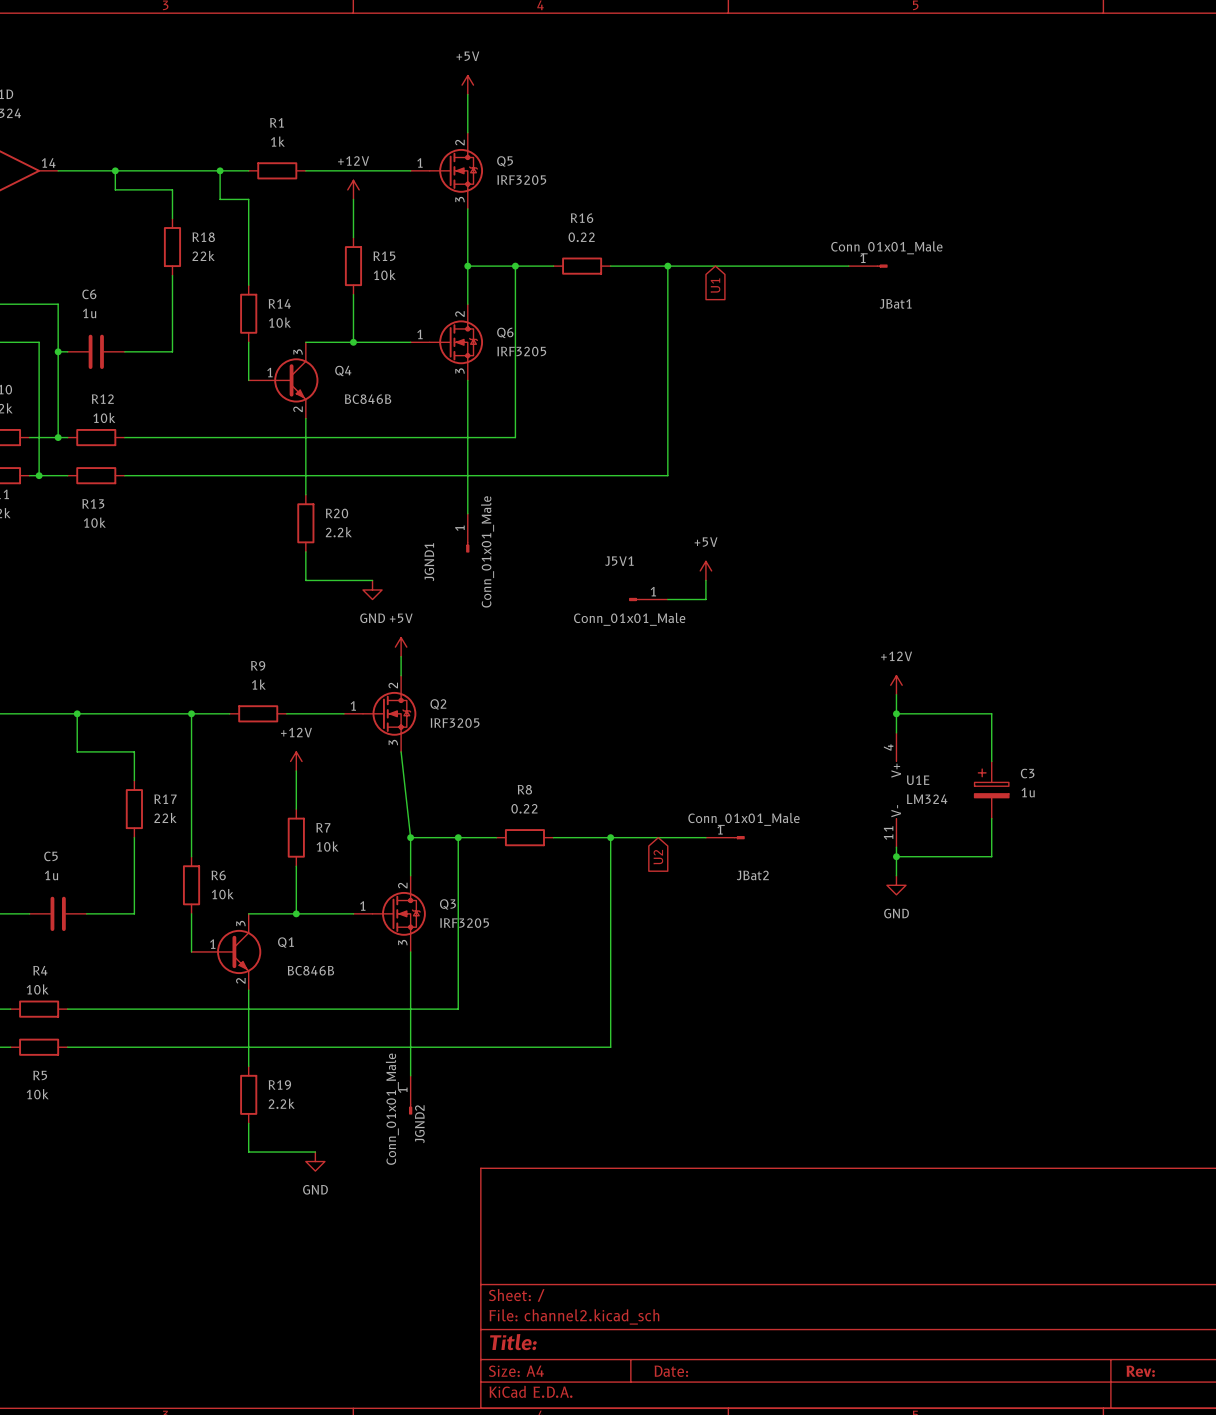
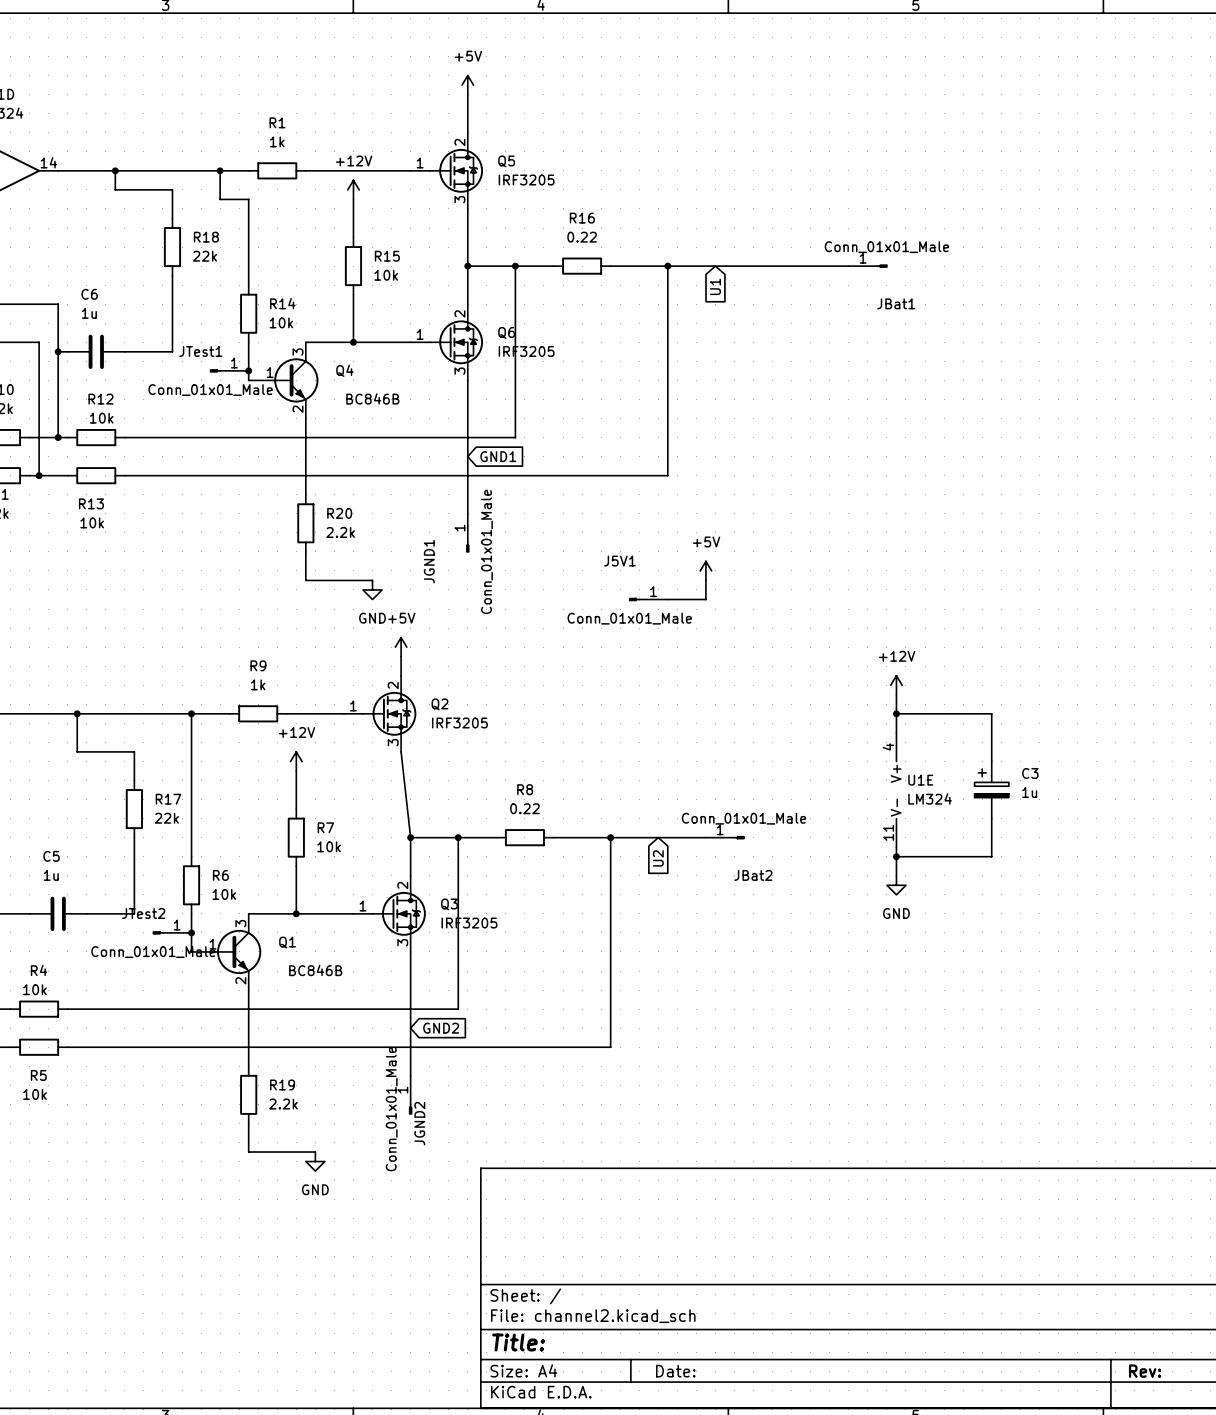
JTest1: none -> Conn_01x01_Male (229, 370)
junction: none -> (248, 370)
global label: none -> GND1 (498, 456)
JTest2: none -> Conn_01x01_Male (172, 932)
junction: none -> (191, 932)
global label: none -> GND2 (441, 1028)

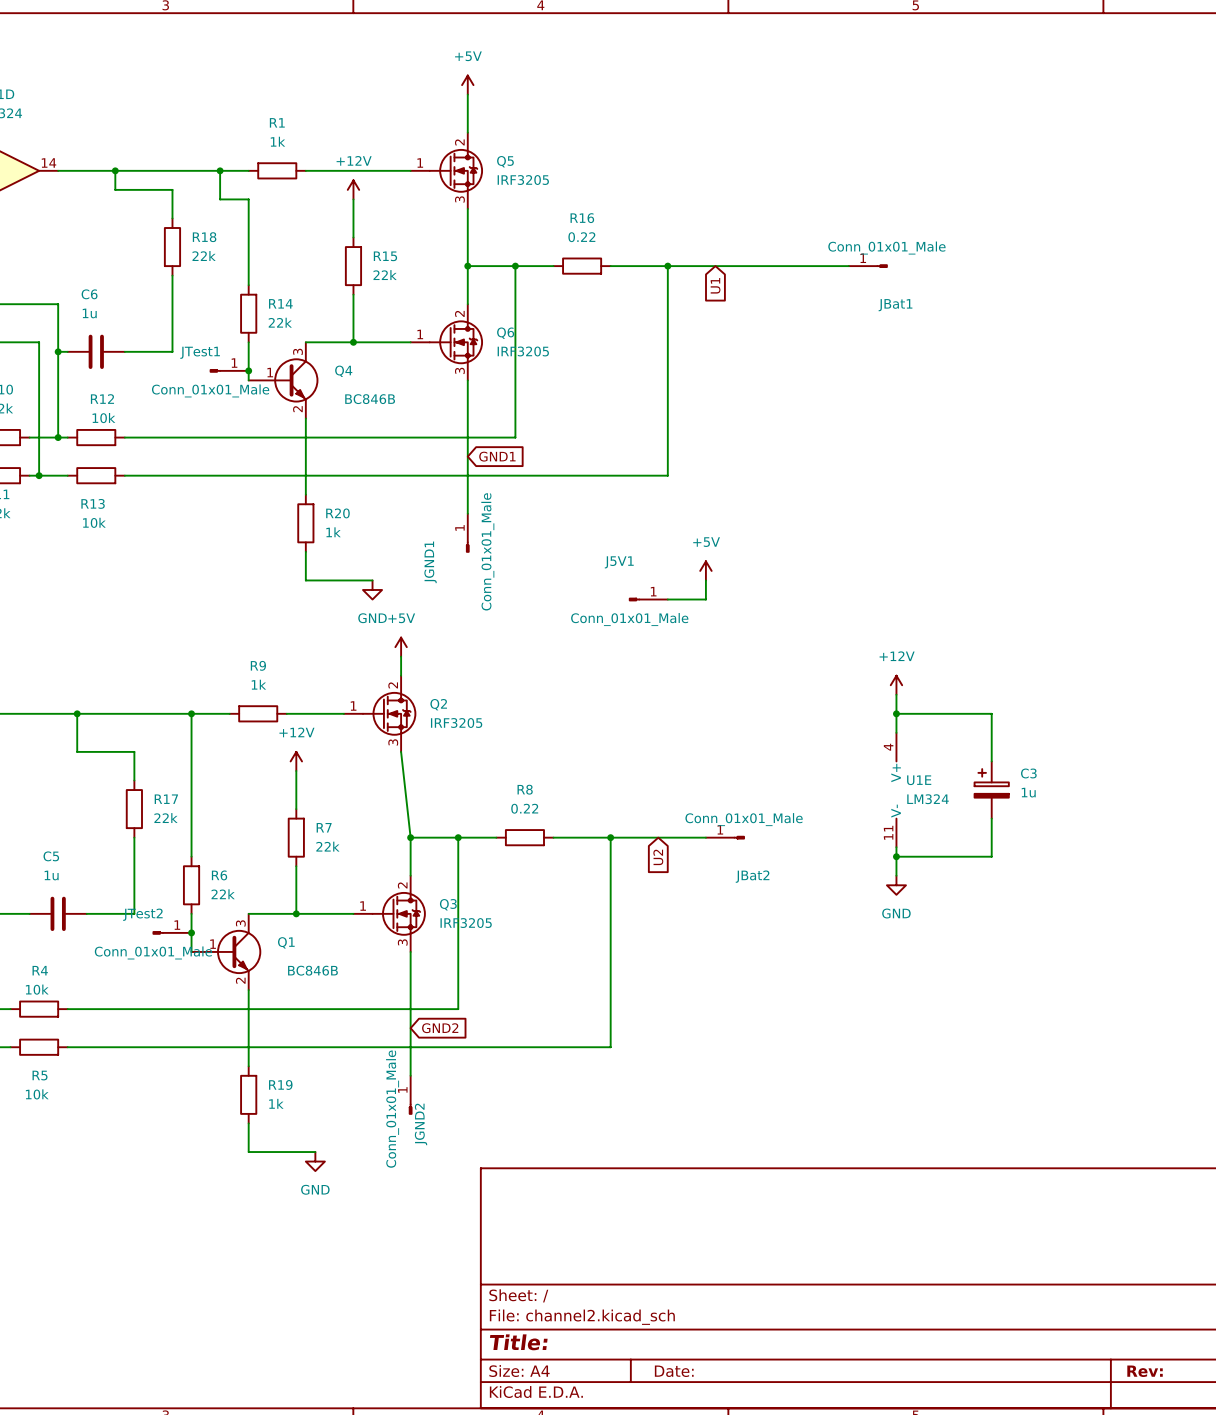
R15 value: 10k (386, 275) -> 22k (385, 275)
R14 value: 10k (281, 322) -> 22k (280, 322)
R20 value: 2.2k (340, 532) -> 1k (333, 532)
R7 value: 10k (329, 846) -> 22k (327, 846)
R6 value: 10k (224, 894) -> 22k (223, 894)
R19 value: 2.2k (283, 1104) -> 1k (276, 1103)

